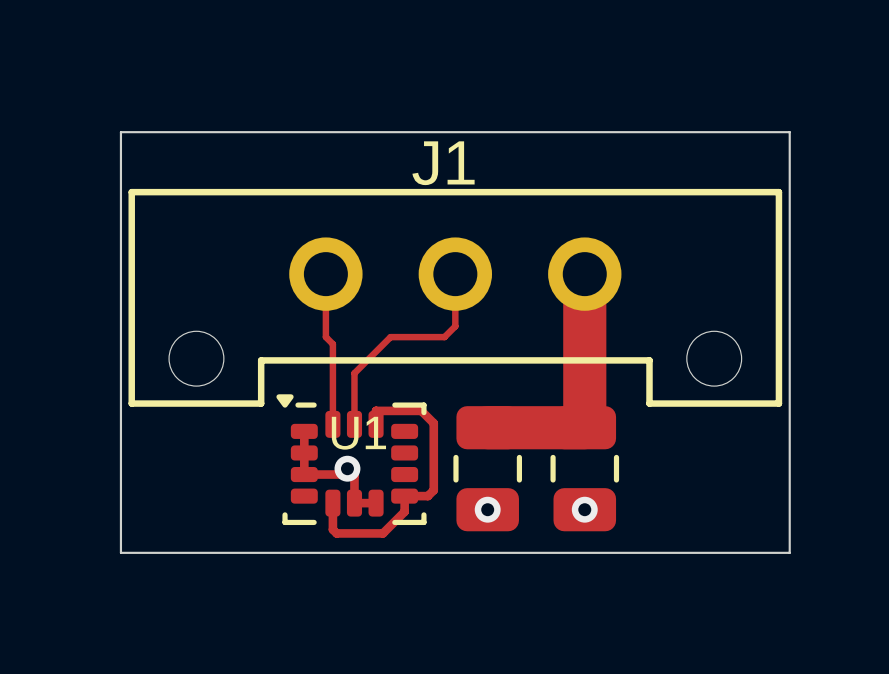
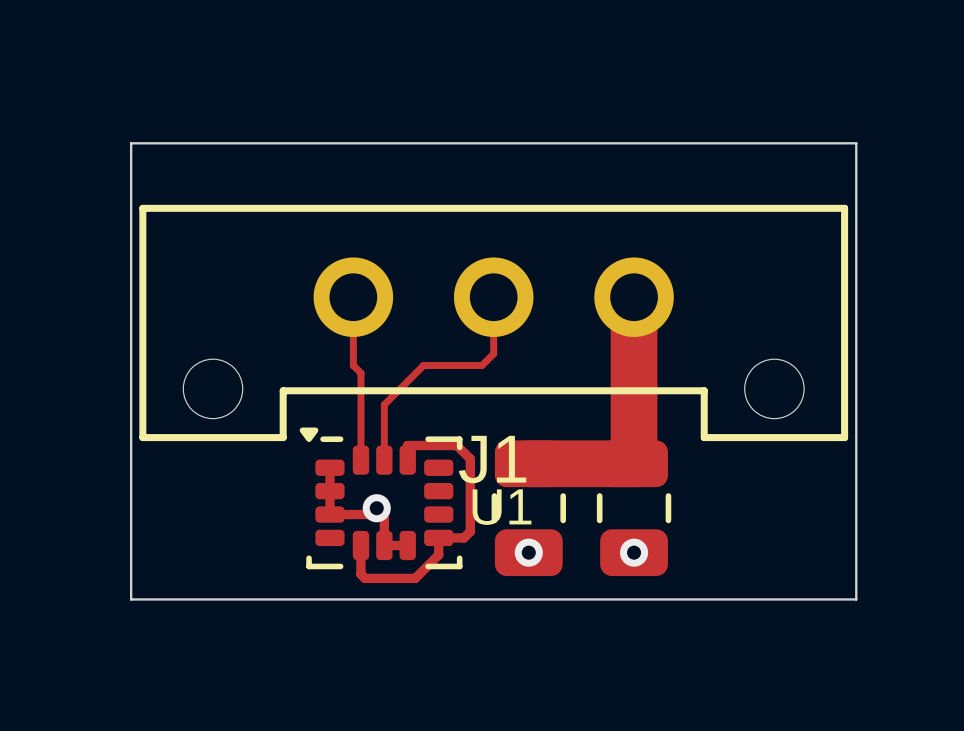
J1 name position: J1 (443, 163) -> J1 (492, 459)
U1 name position: U1 (358, 433) -> U1 (502, 507)

